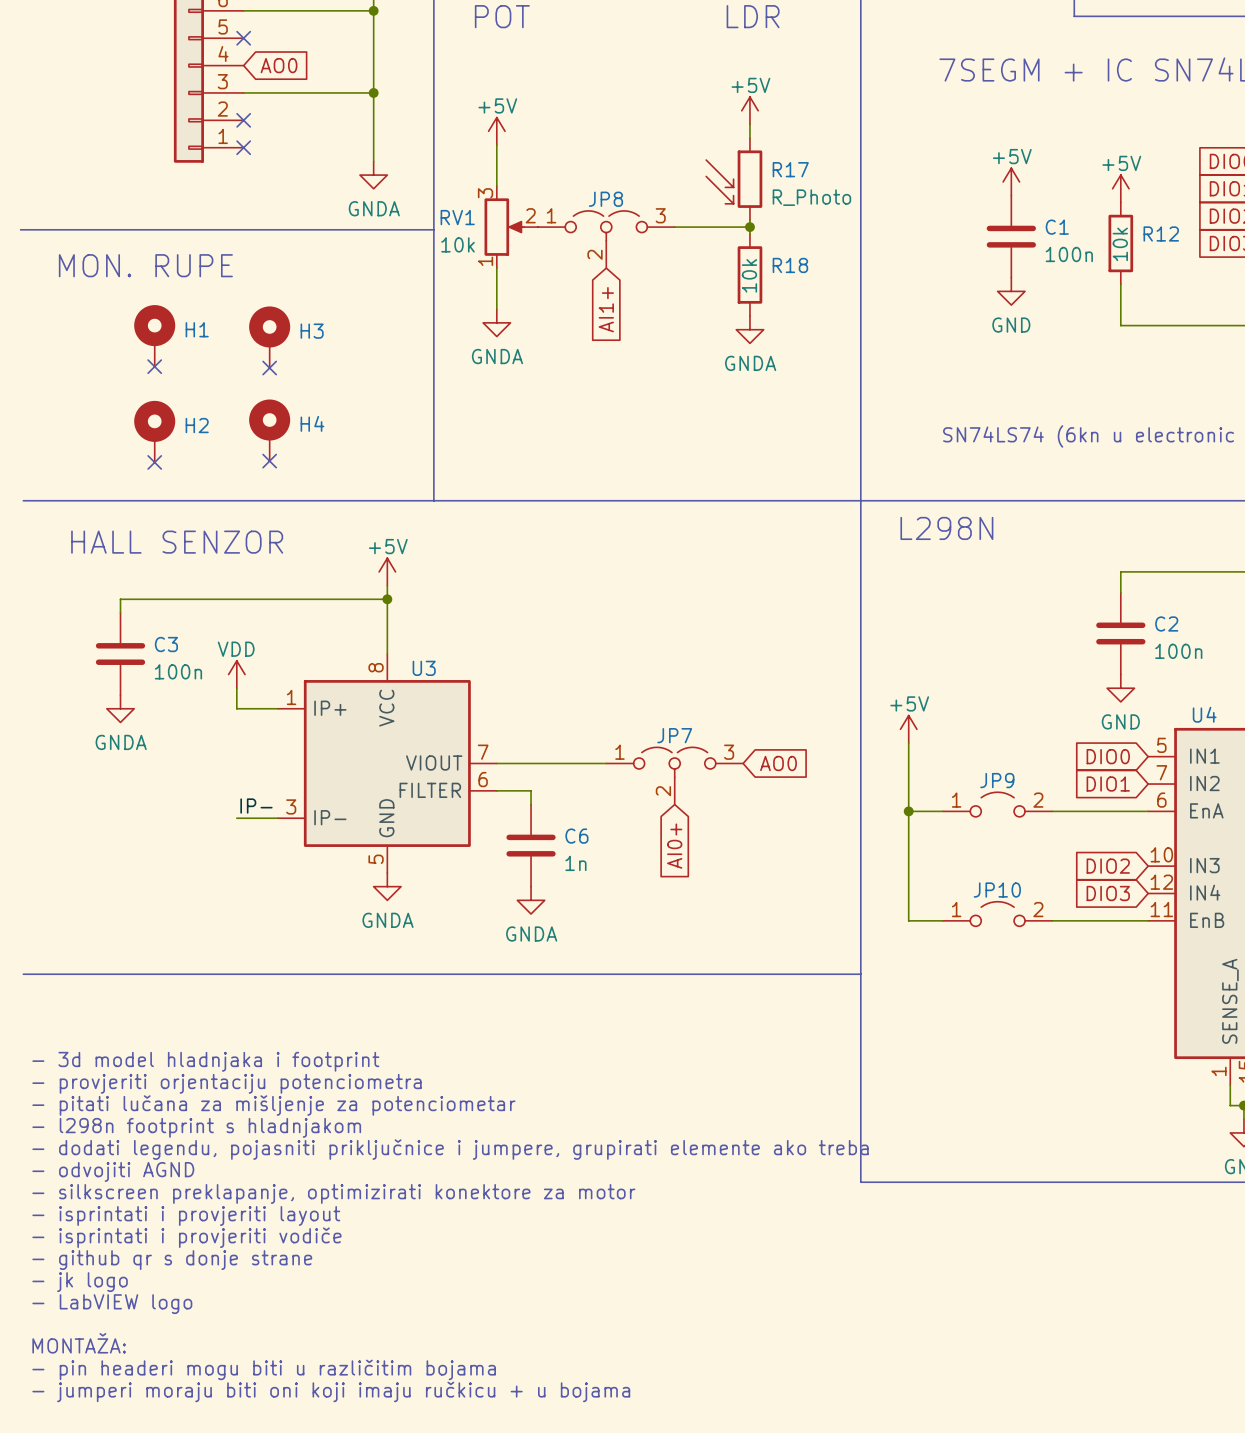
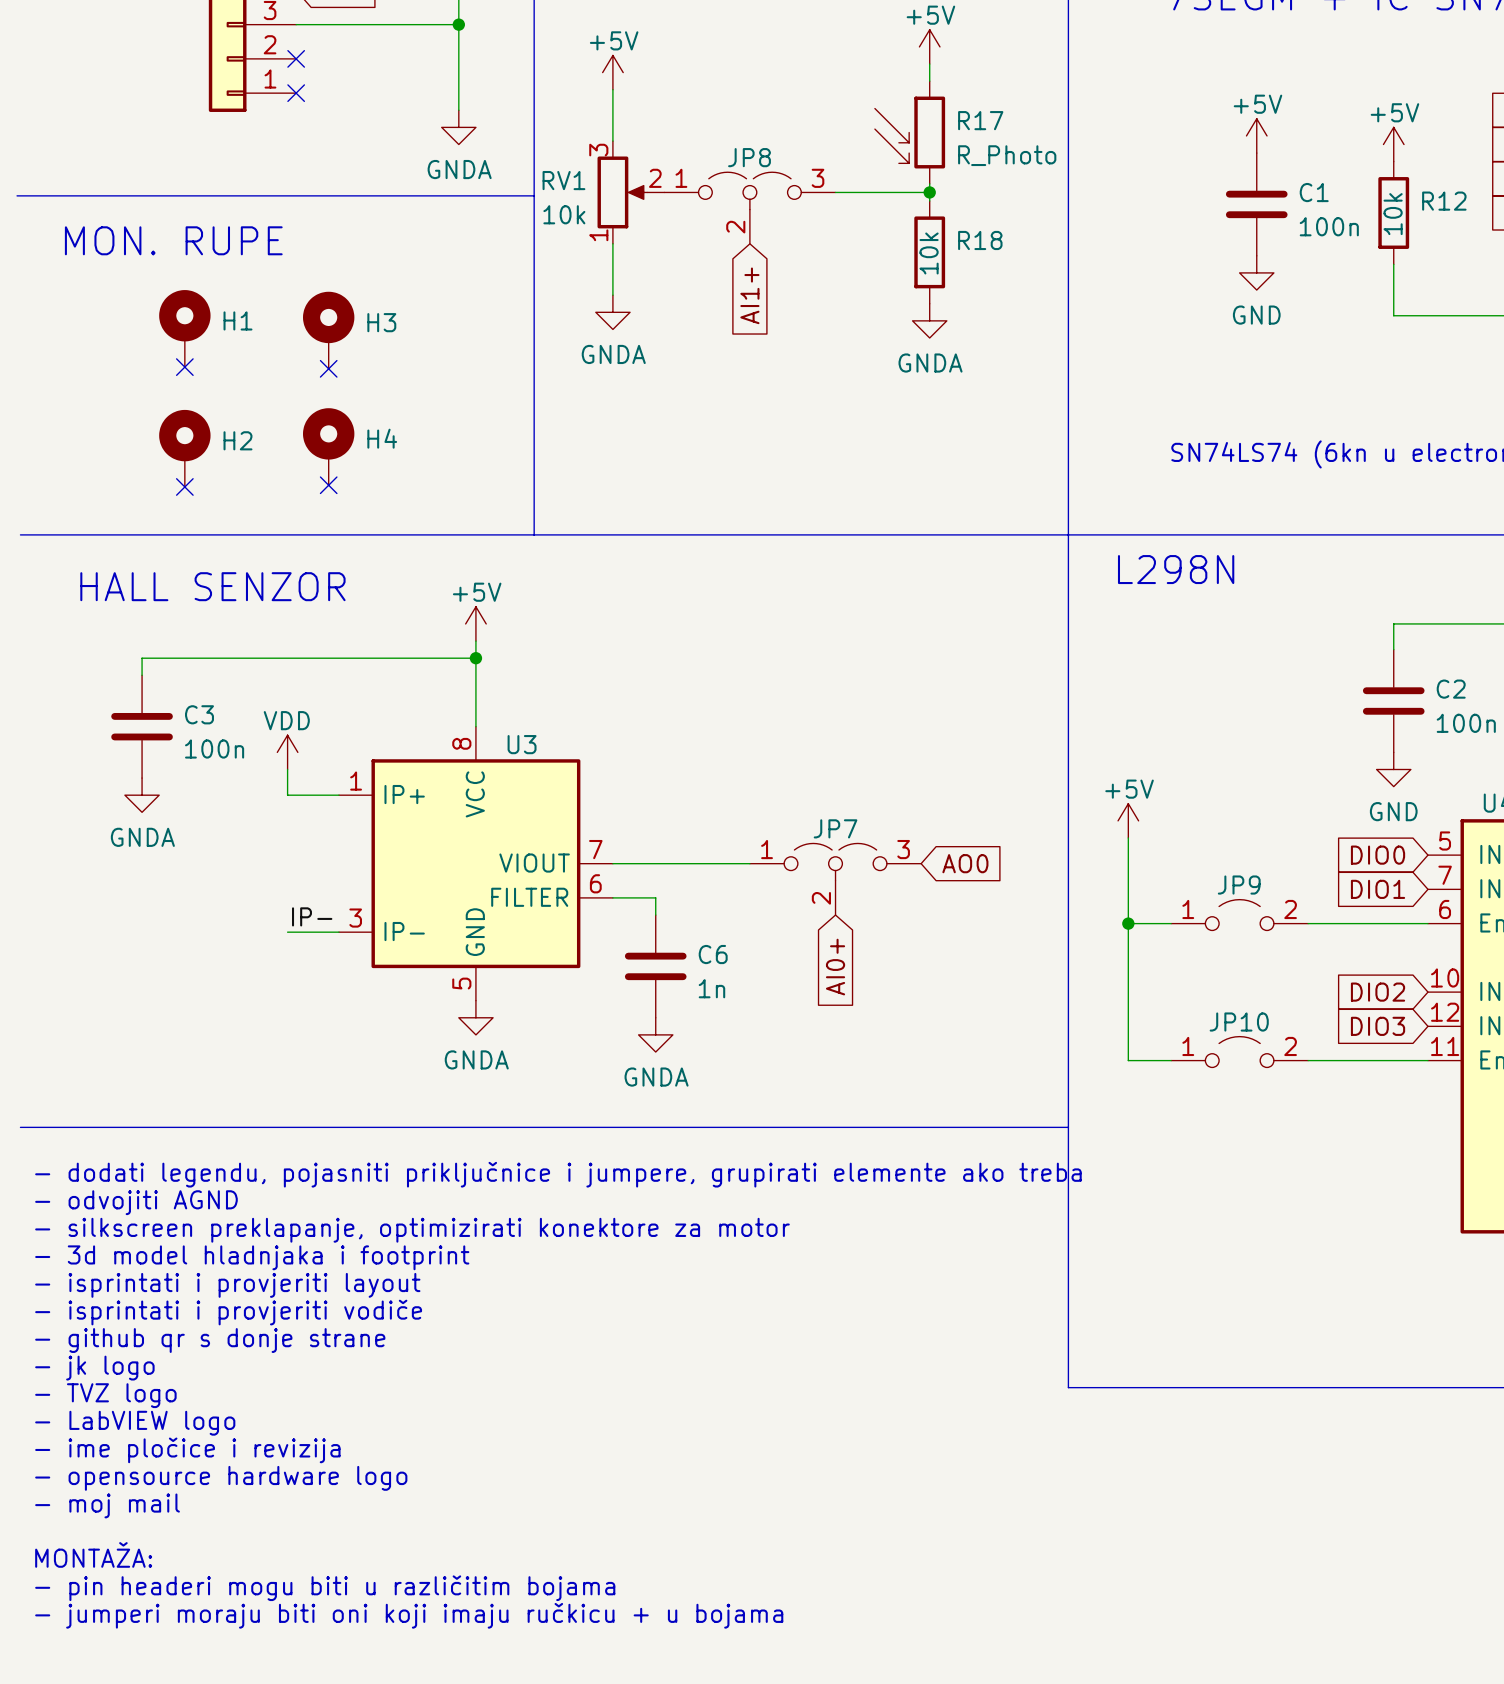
text position: - 3d model hladnjaka i footprint (205, 1061) -> - 3d model hladnjaka i footprint (252, 1257)
text: - provjeriti orjentaciju potenciometra (227, 1083) -> none
text: - pitati lučana za mišljenje za potenciometar (273, 1105) -> none
text: - l298n footprint s hladnjakom (196, 1127) -> none
text position: - dodati legendu, pojasniti priključnice i jumpere, grupirati elemente ako treba (450, 1149) -> - dodati legendu, pojasniti priključnice i jumpere, grupirati elemente ako treba (558, 1174)
text position: - odvojiti AGND (113, 1171) -> - odvojiti AGND (136, 1202)
text: none -> - TVZ logo (105, 1395)
text position: - silkscreen preklapanje, optimizirati konektore za motor (333, 1193) -> - silkscreen preklapanje, optimizirati konektore za motor (412, 1230)
text position: - isprintati i provjeriti layout (186, 1215) -> - isprintati i provjeriti layout (227, 1285)
text: none -> - ime pločice i revizija (187, 1450)
text position: - isprintati i provjeriti vodiče (186, 1237) -> - isprintati i provjeriti vodiče (228, 1312)
text: none -> - opensource hardware logo (221, 1478)
text position: - github qr s donje strane (172, 1260) -> - github qr s donje strane (210, 1340)
text: none -> - moj mail (107, 1505)
text position: - jk logo (80, 1282) -> - jk logo (94, 1368)
text position: - LabVIEW logo (112, 1304) -> - LabVIEW logo (135, 1423)
text position: MONTAŽA: (79, 1343) -> MONTAŽA: (93, 1554)
text position: - pin headeri mogu biti u različitim bojama (264, 1369) -> - pin headeri mogu biti u različitim bojama (325, 1588)
text position: - jumperi moraju biti oni koji imaju ručkicu + u bojama (331, 1391) -> - jumperi moraju biti oni koji imaju ručkicu + u bojama (409, 1615)

